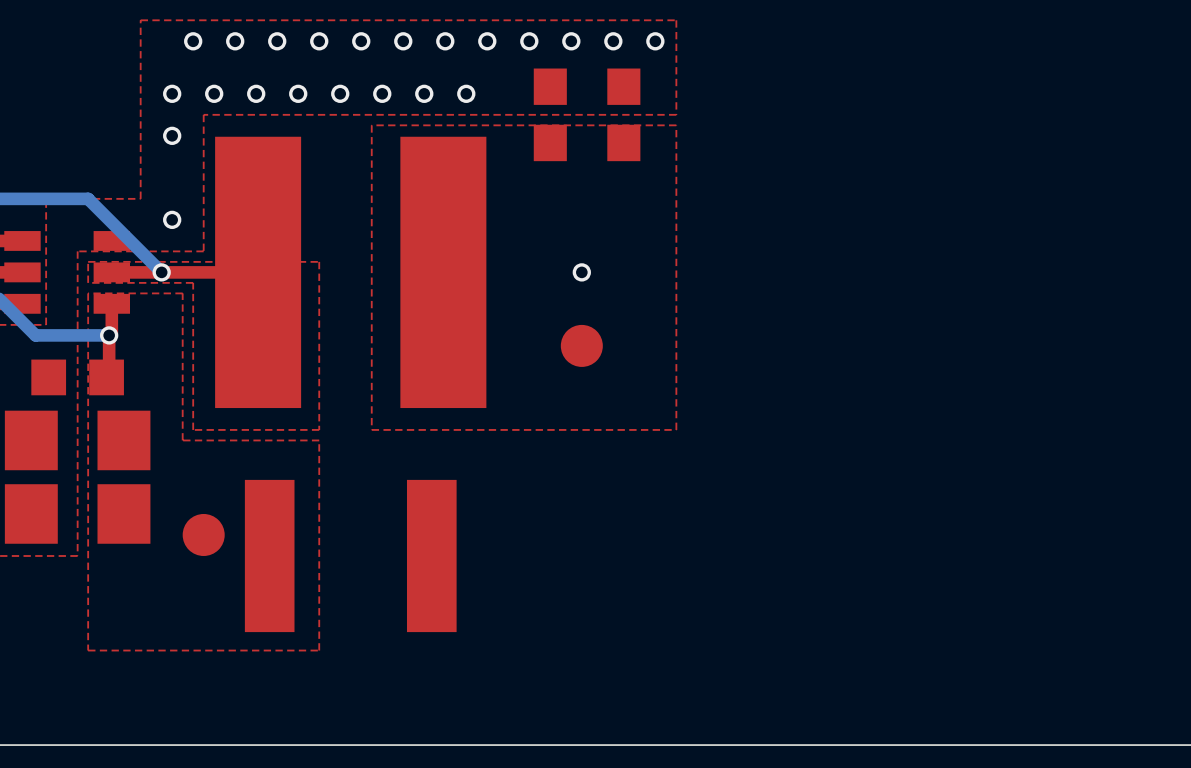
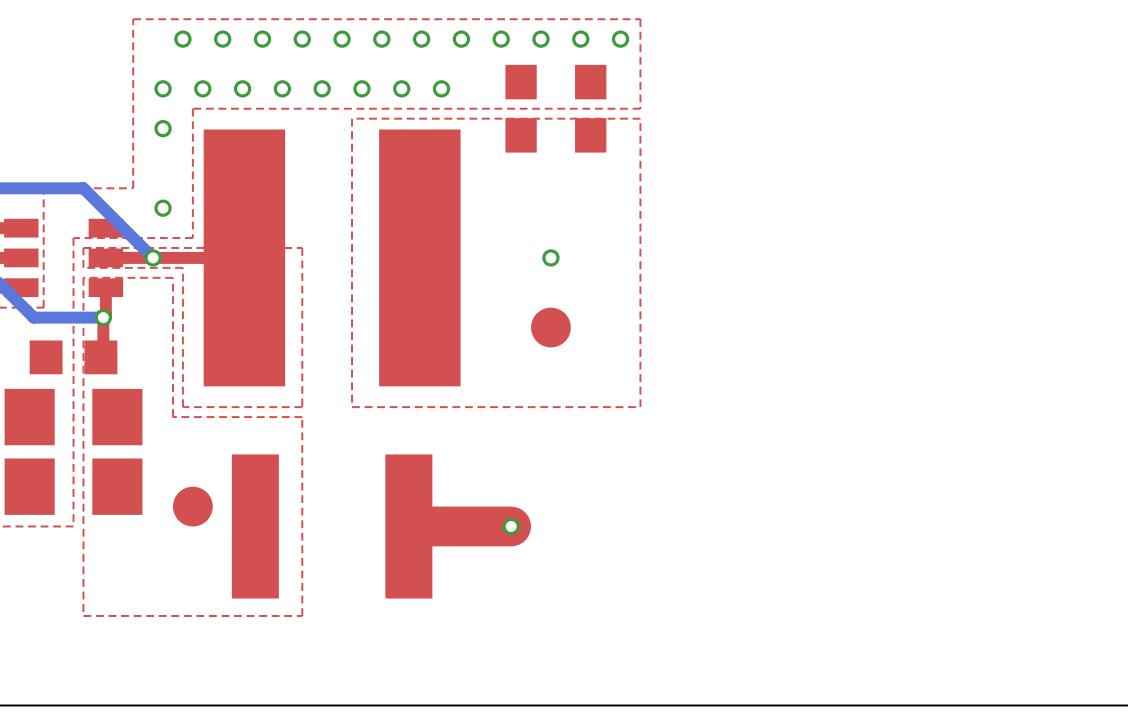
top track: none -> (511, 526) (408, 526)
via: none -> (511, 526)

